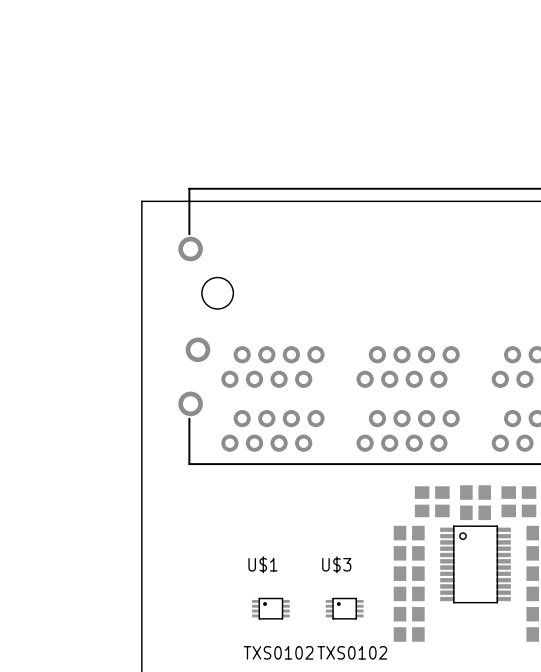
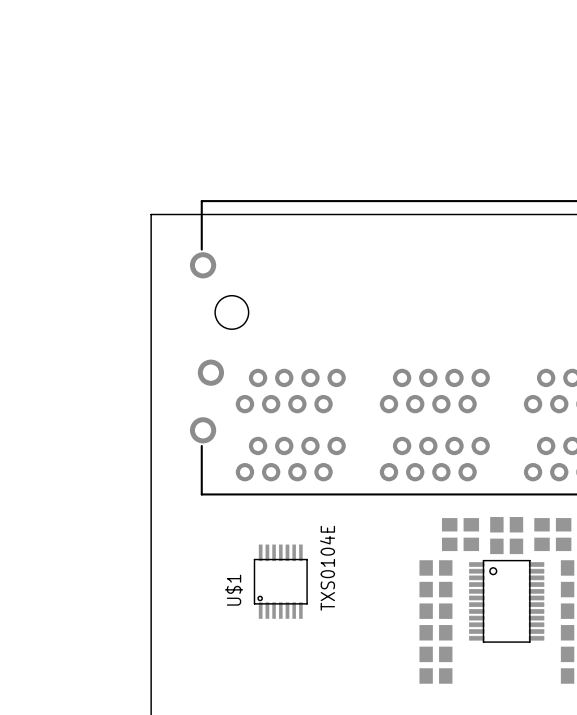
U$1 name position: U$1 (262, 564) -> U$1 (234, 590)
U$1 footprint: [252, 597, 290, 620] -> [253, 544, 308, 619]
U$3: TXS0102 (344, 608) -> none
U$1 value: TXS0102 (278, 652) -> TXS0104E (327, 568)

